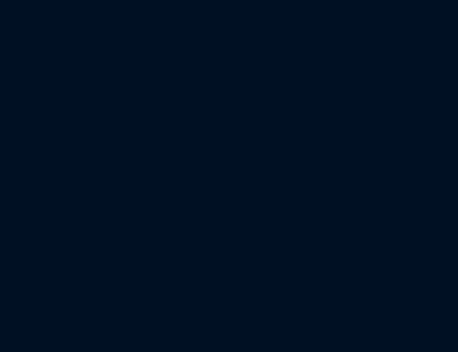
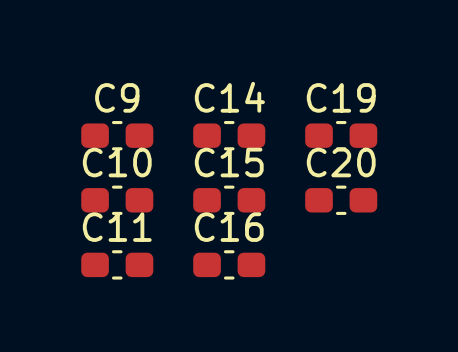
C9: none -> (117, 135)
C14: none -> (229, 135)
C19: none -> (341, 135)
C10: none -> (117, 200)
C15: none -> (229, 200)
C20: none -> (341, 200)
C11: none -> (117, 264)
C16: none -> (229, 264)

